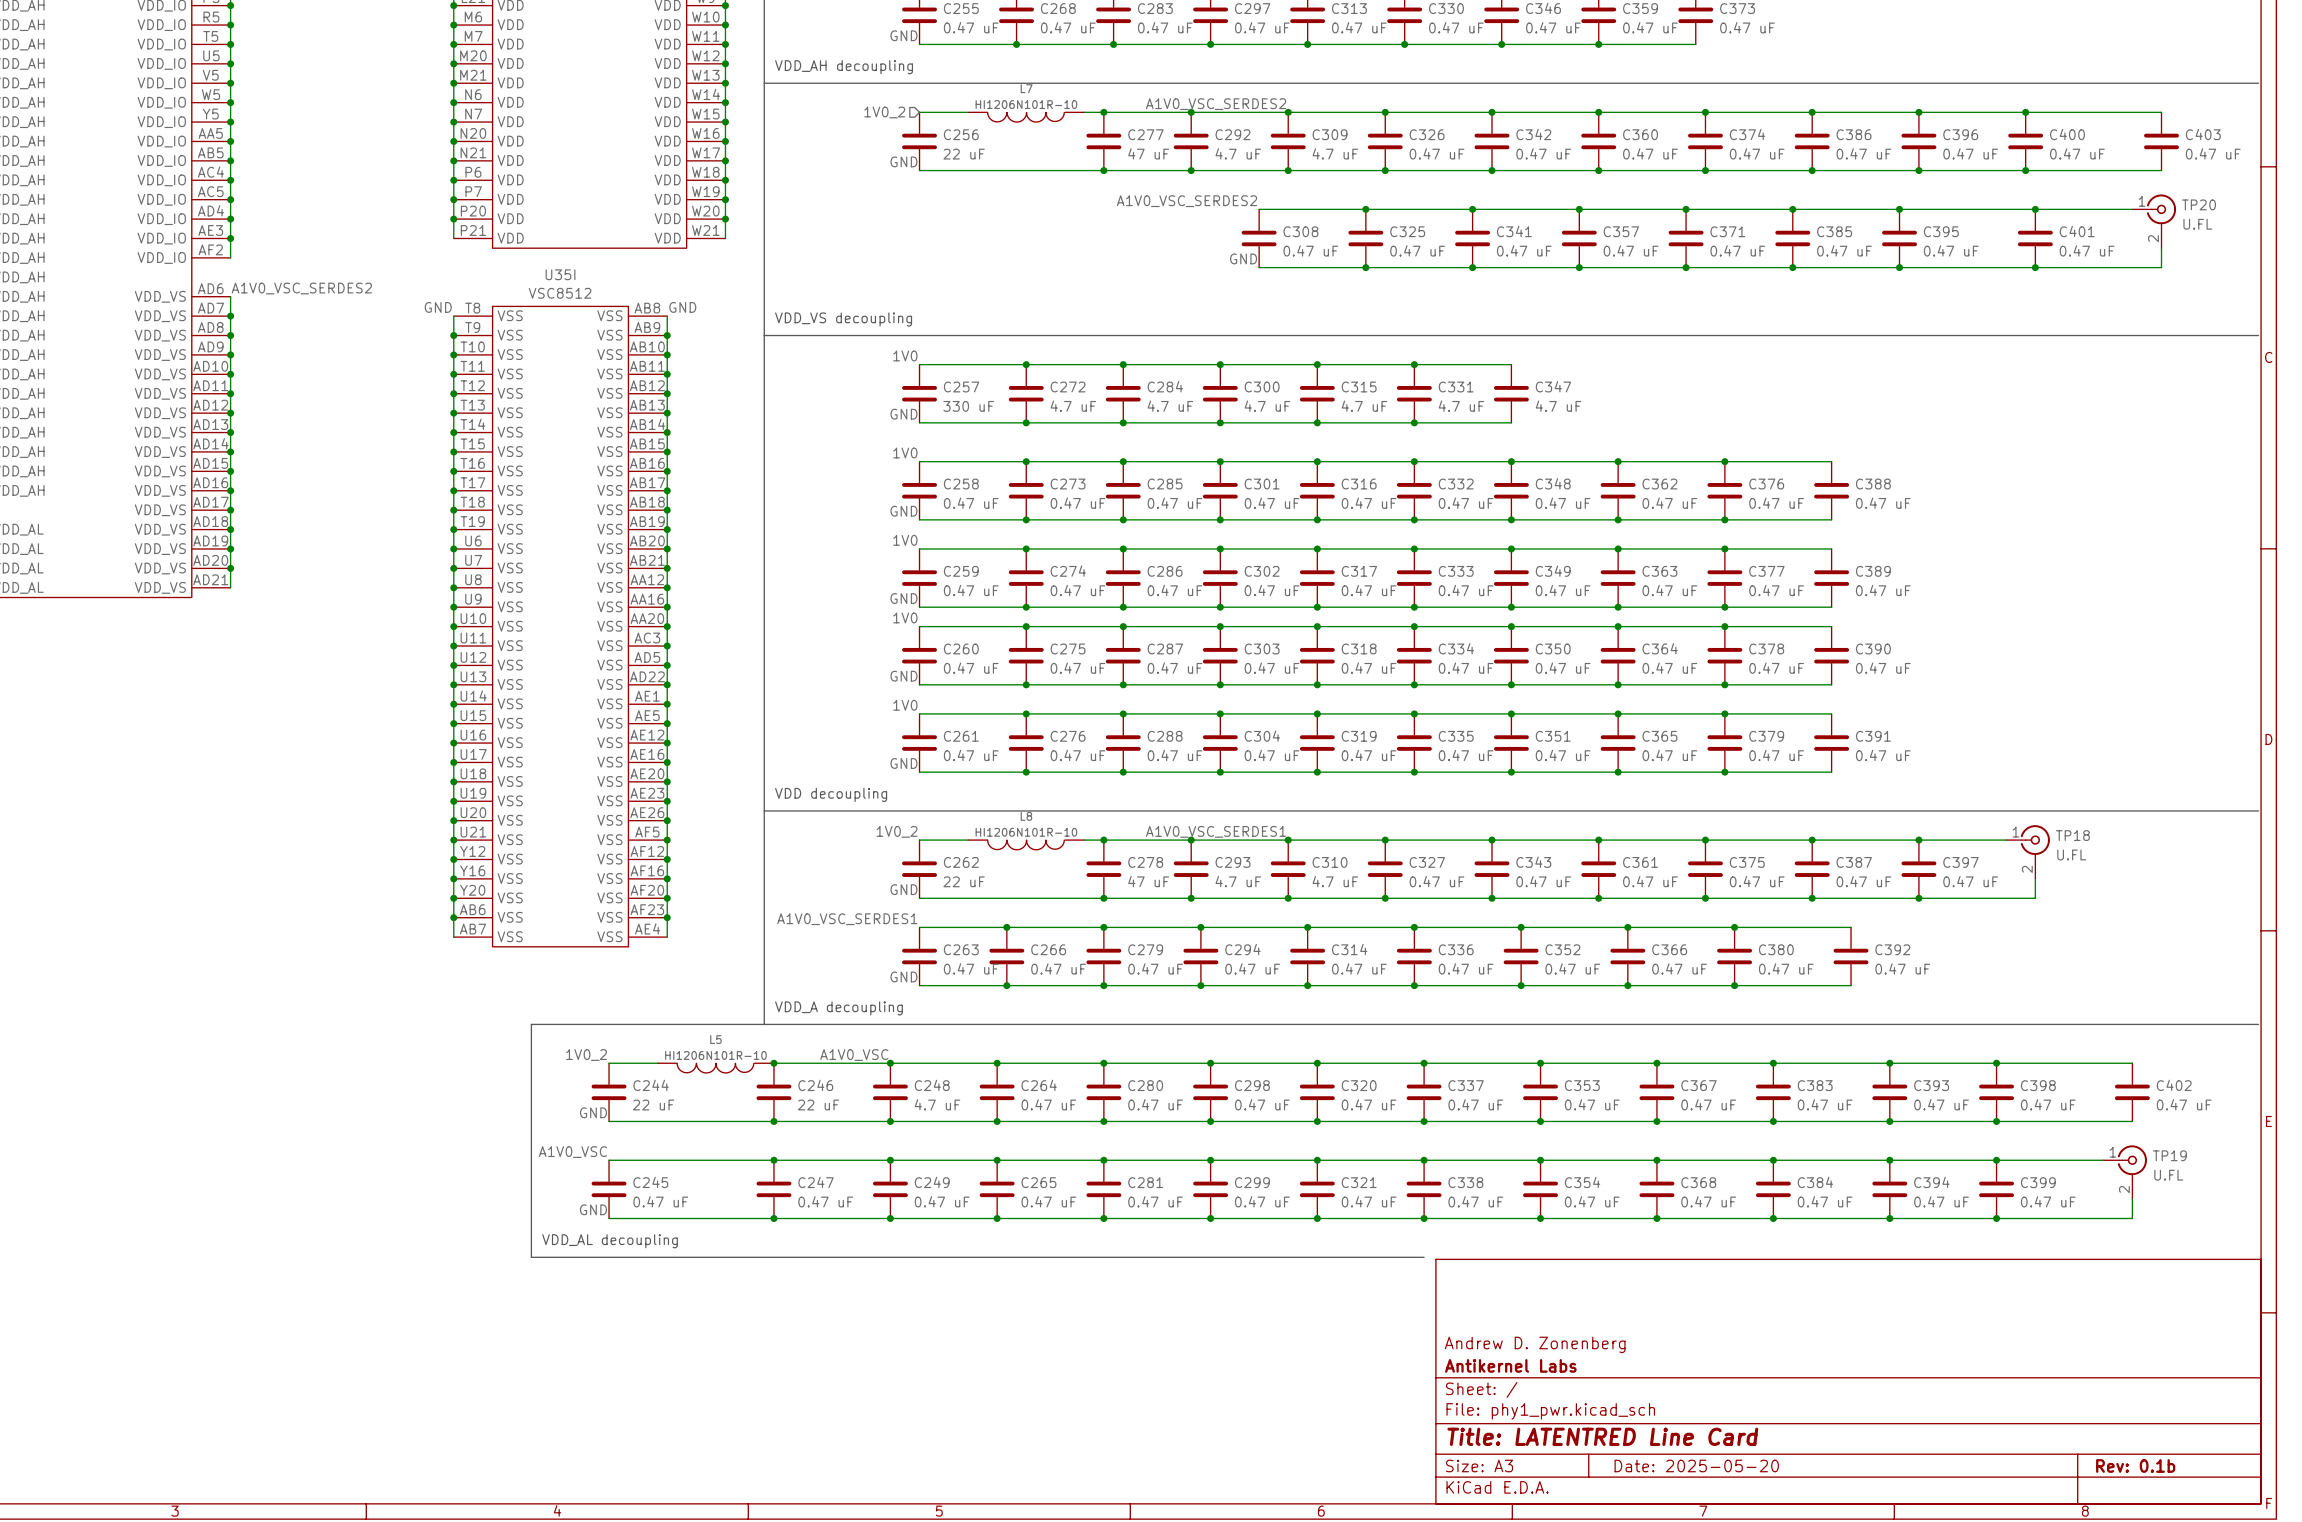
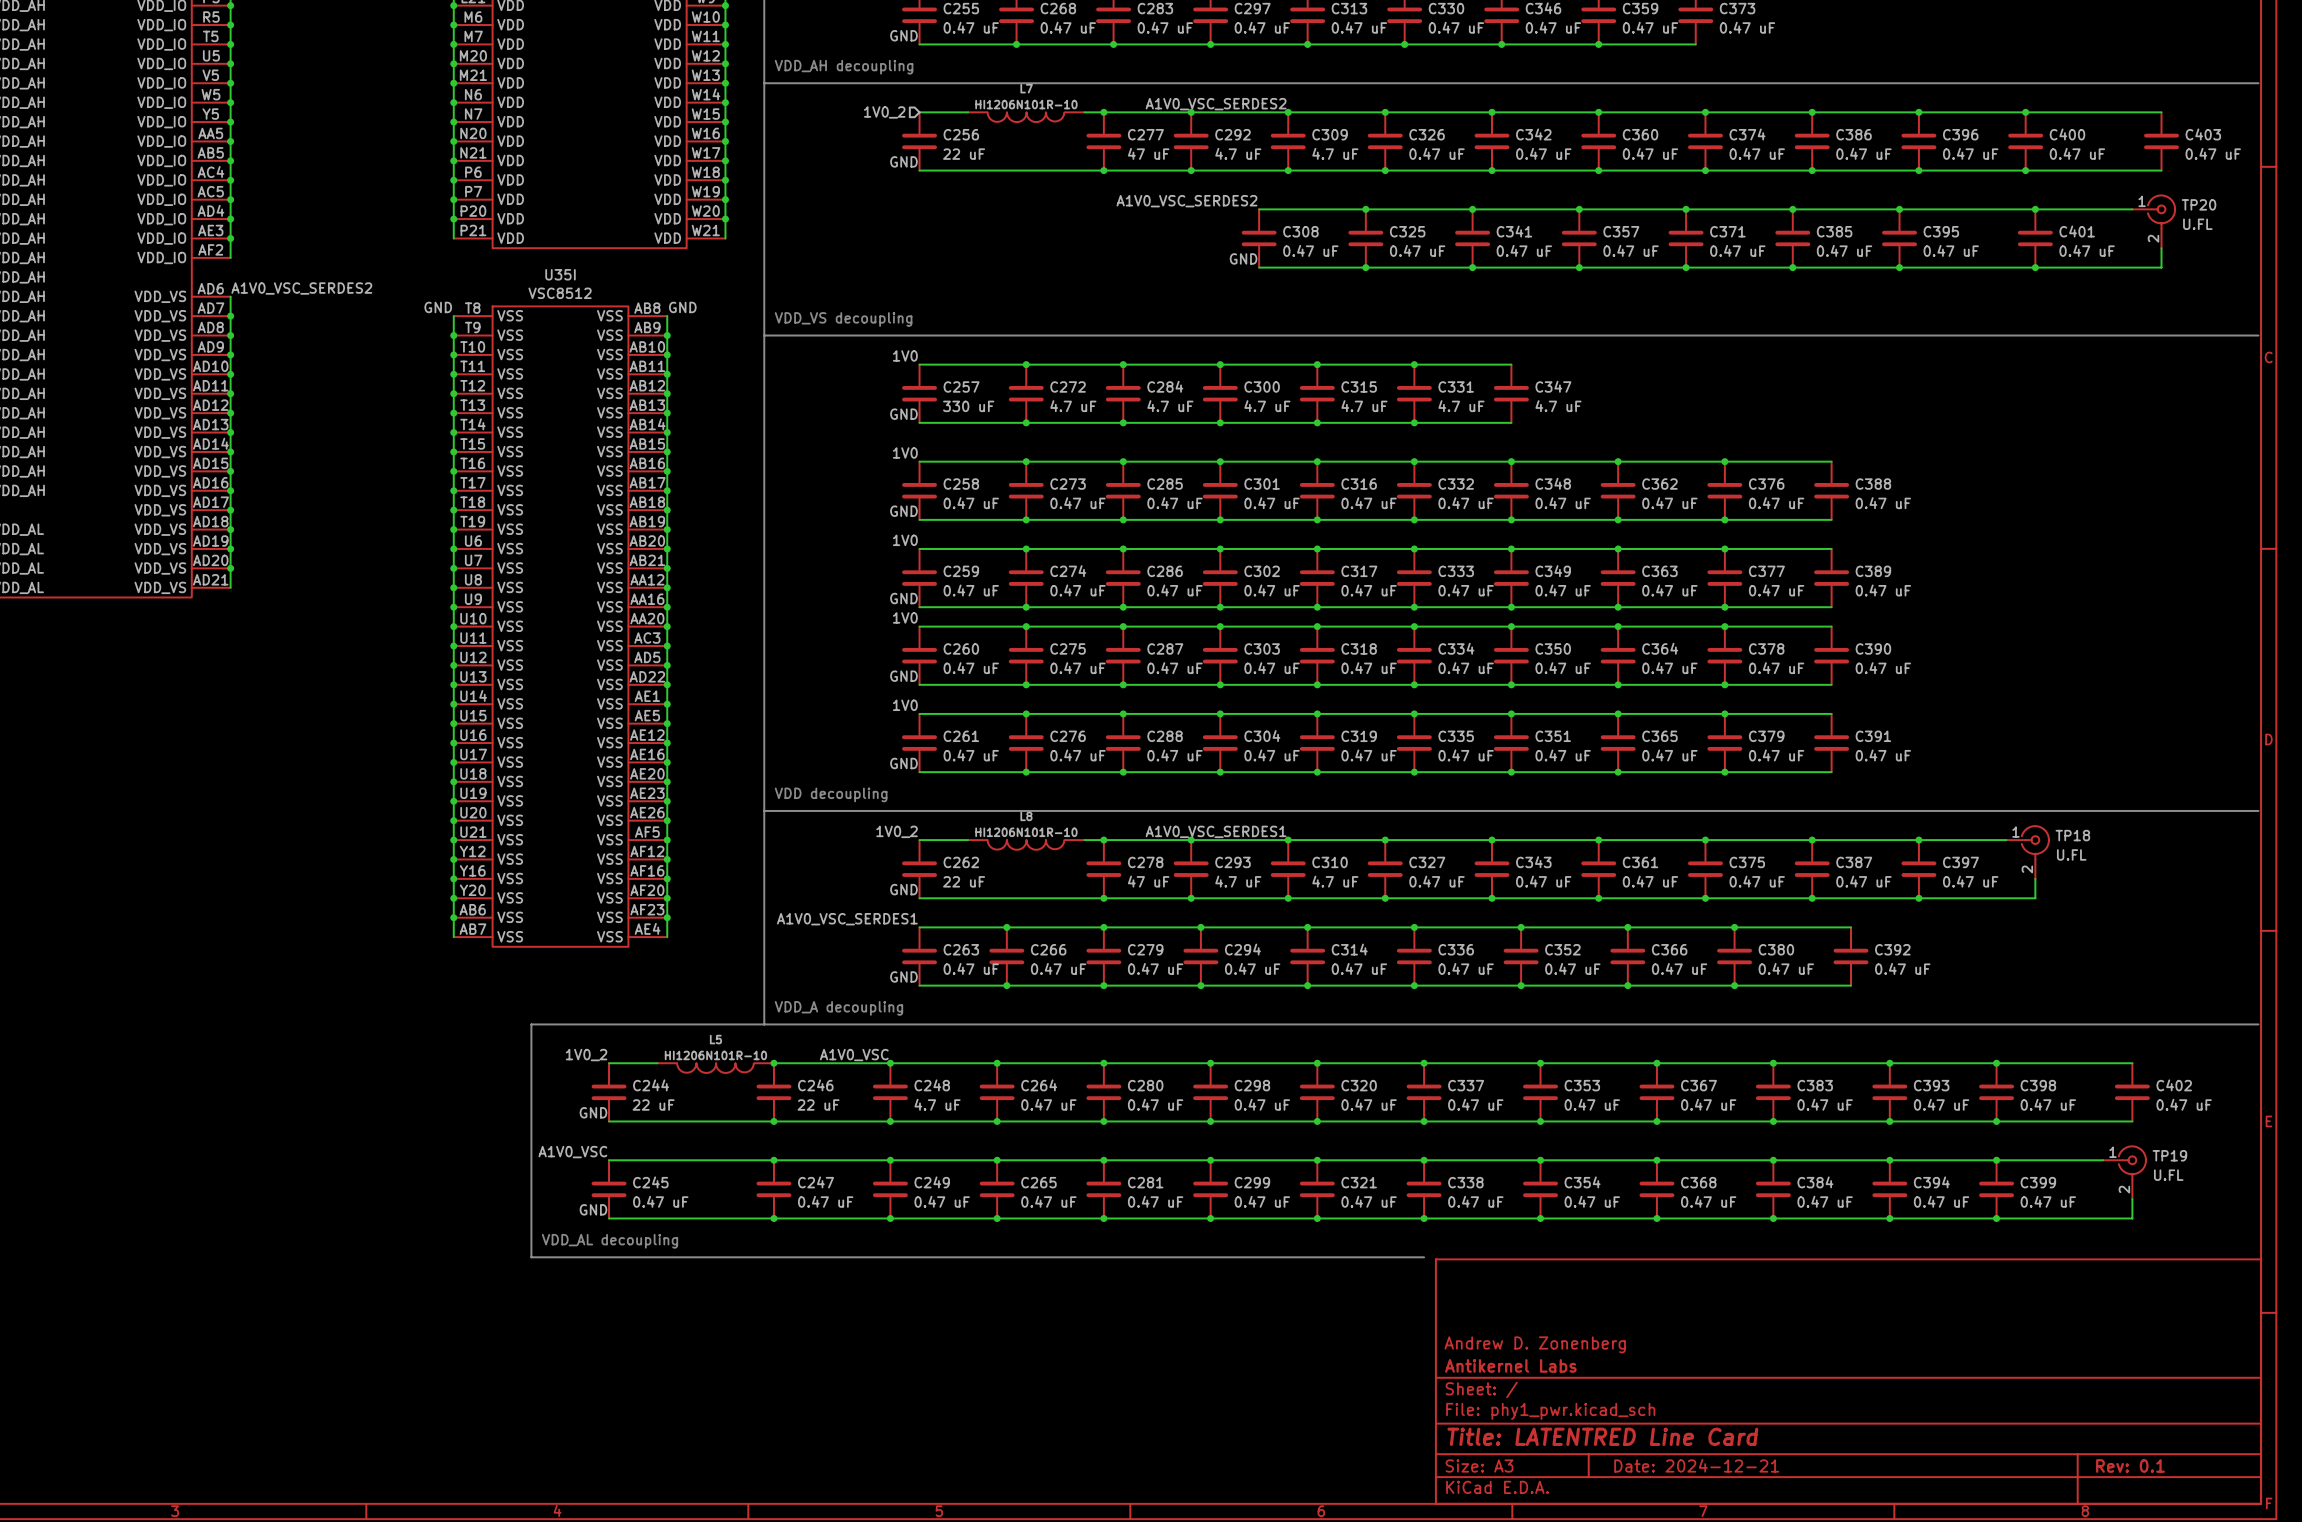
title block: Date: 2025-05-20 (1696, 1465) -> Date: 2024-12-21 (1696, 1465)
title block: Rev: 0.1b (2135, 1465) -> Rev: 0.1 (2130, 1465)

